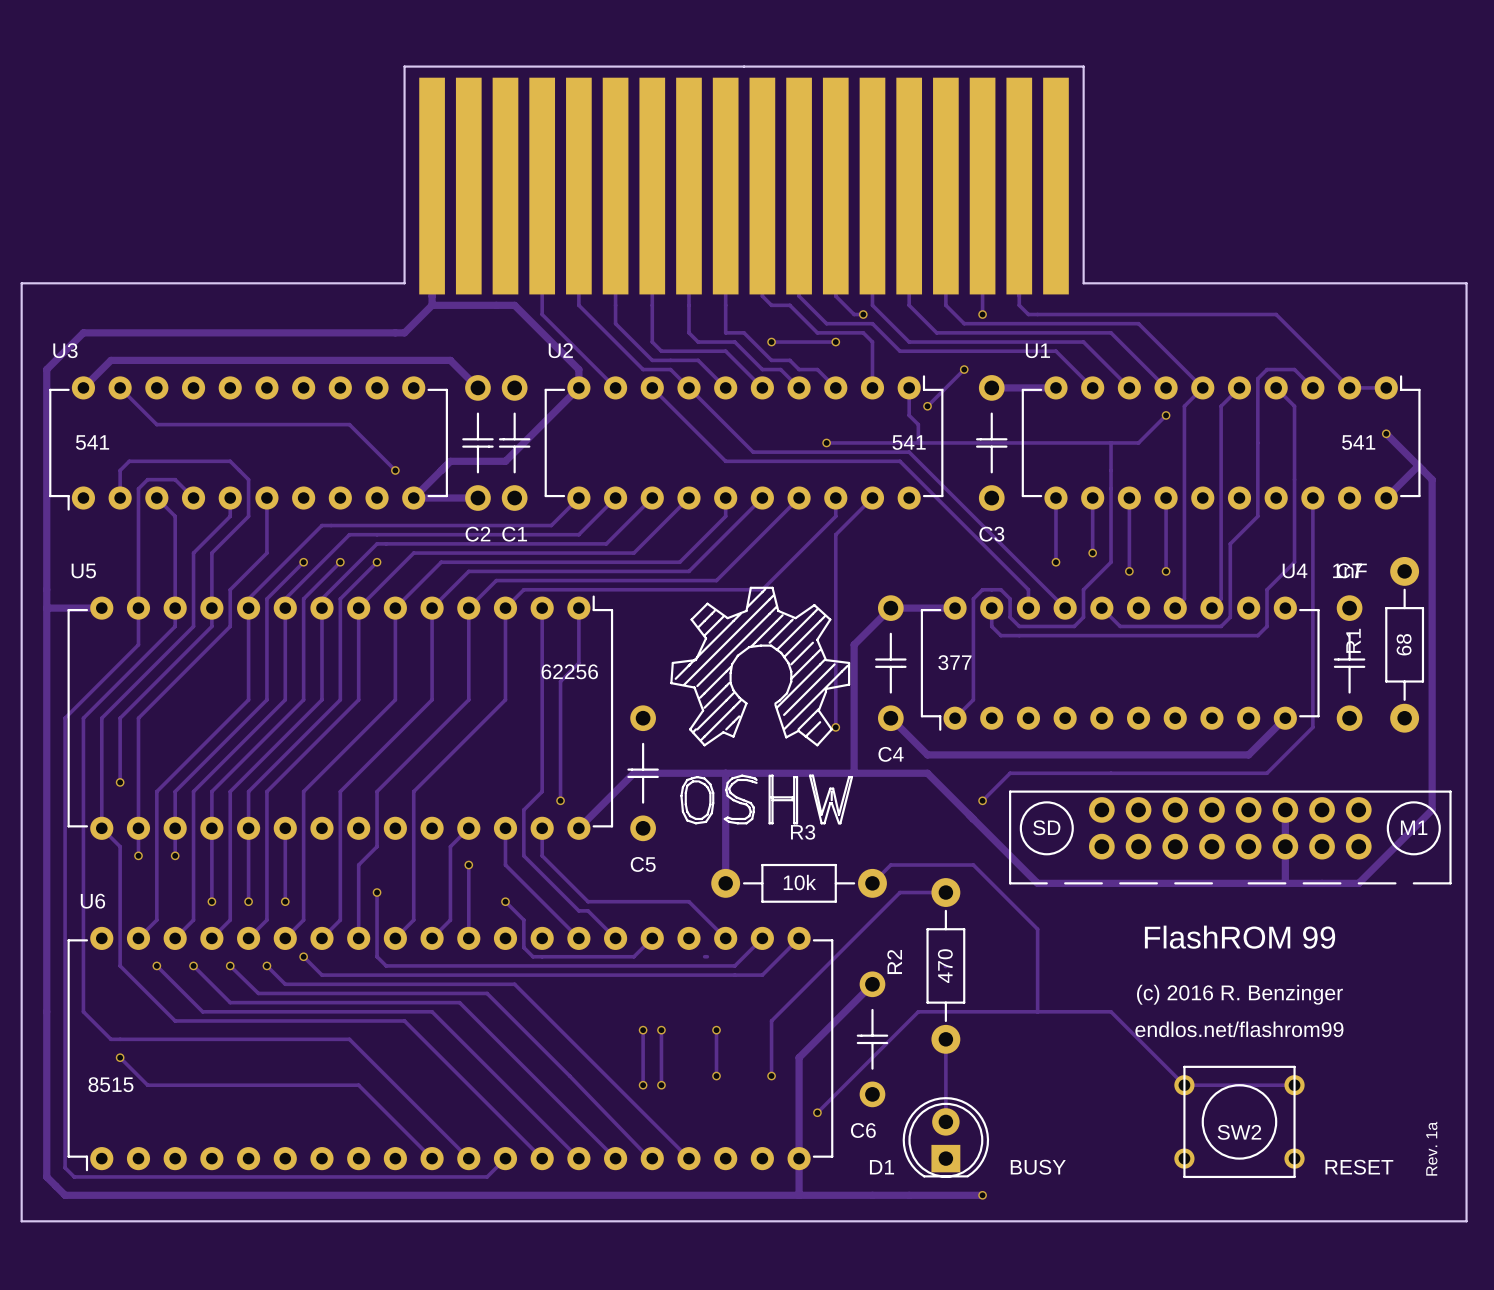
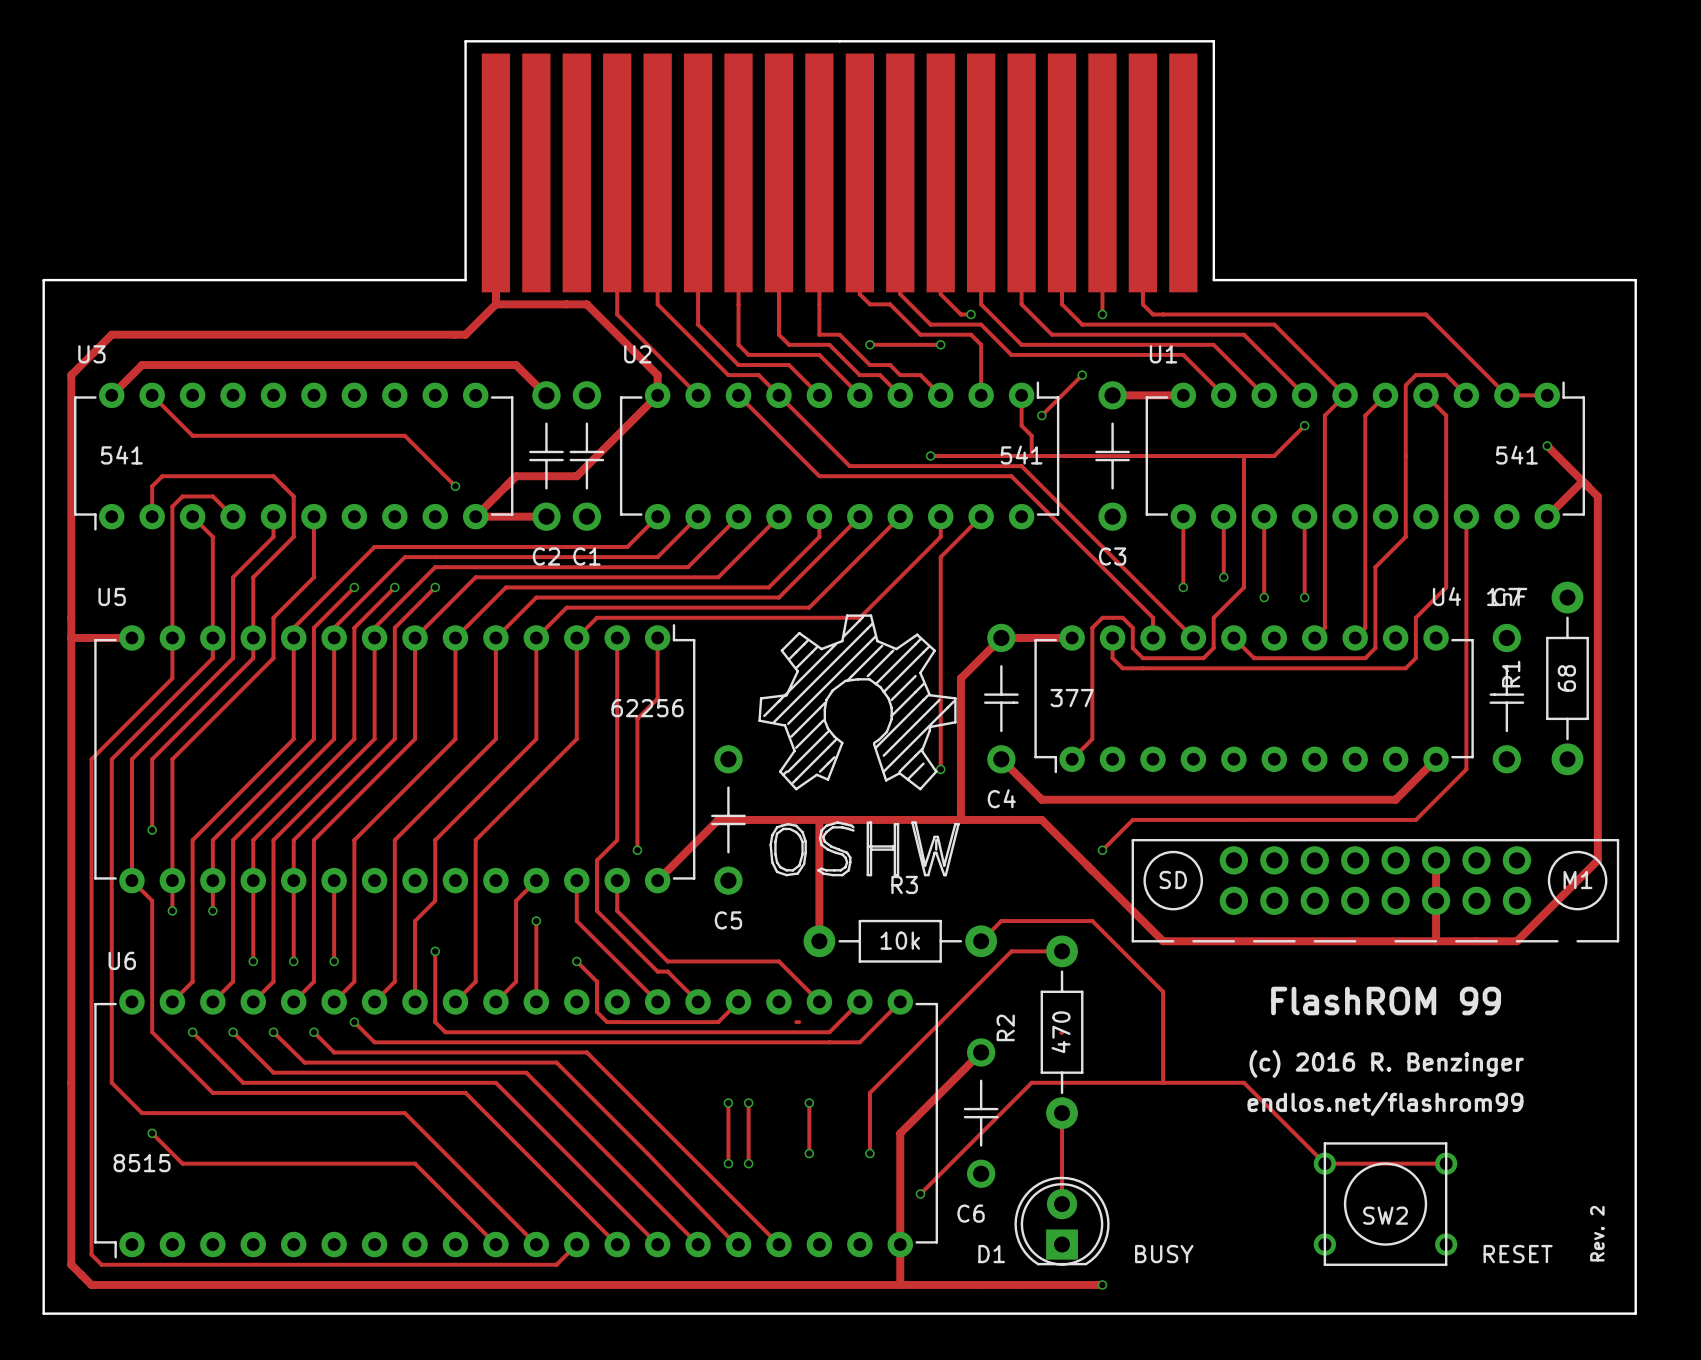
text: Rev. 1a (1431, 1148) -> Rev. 2 (1597, 1233)

